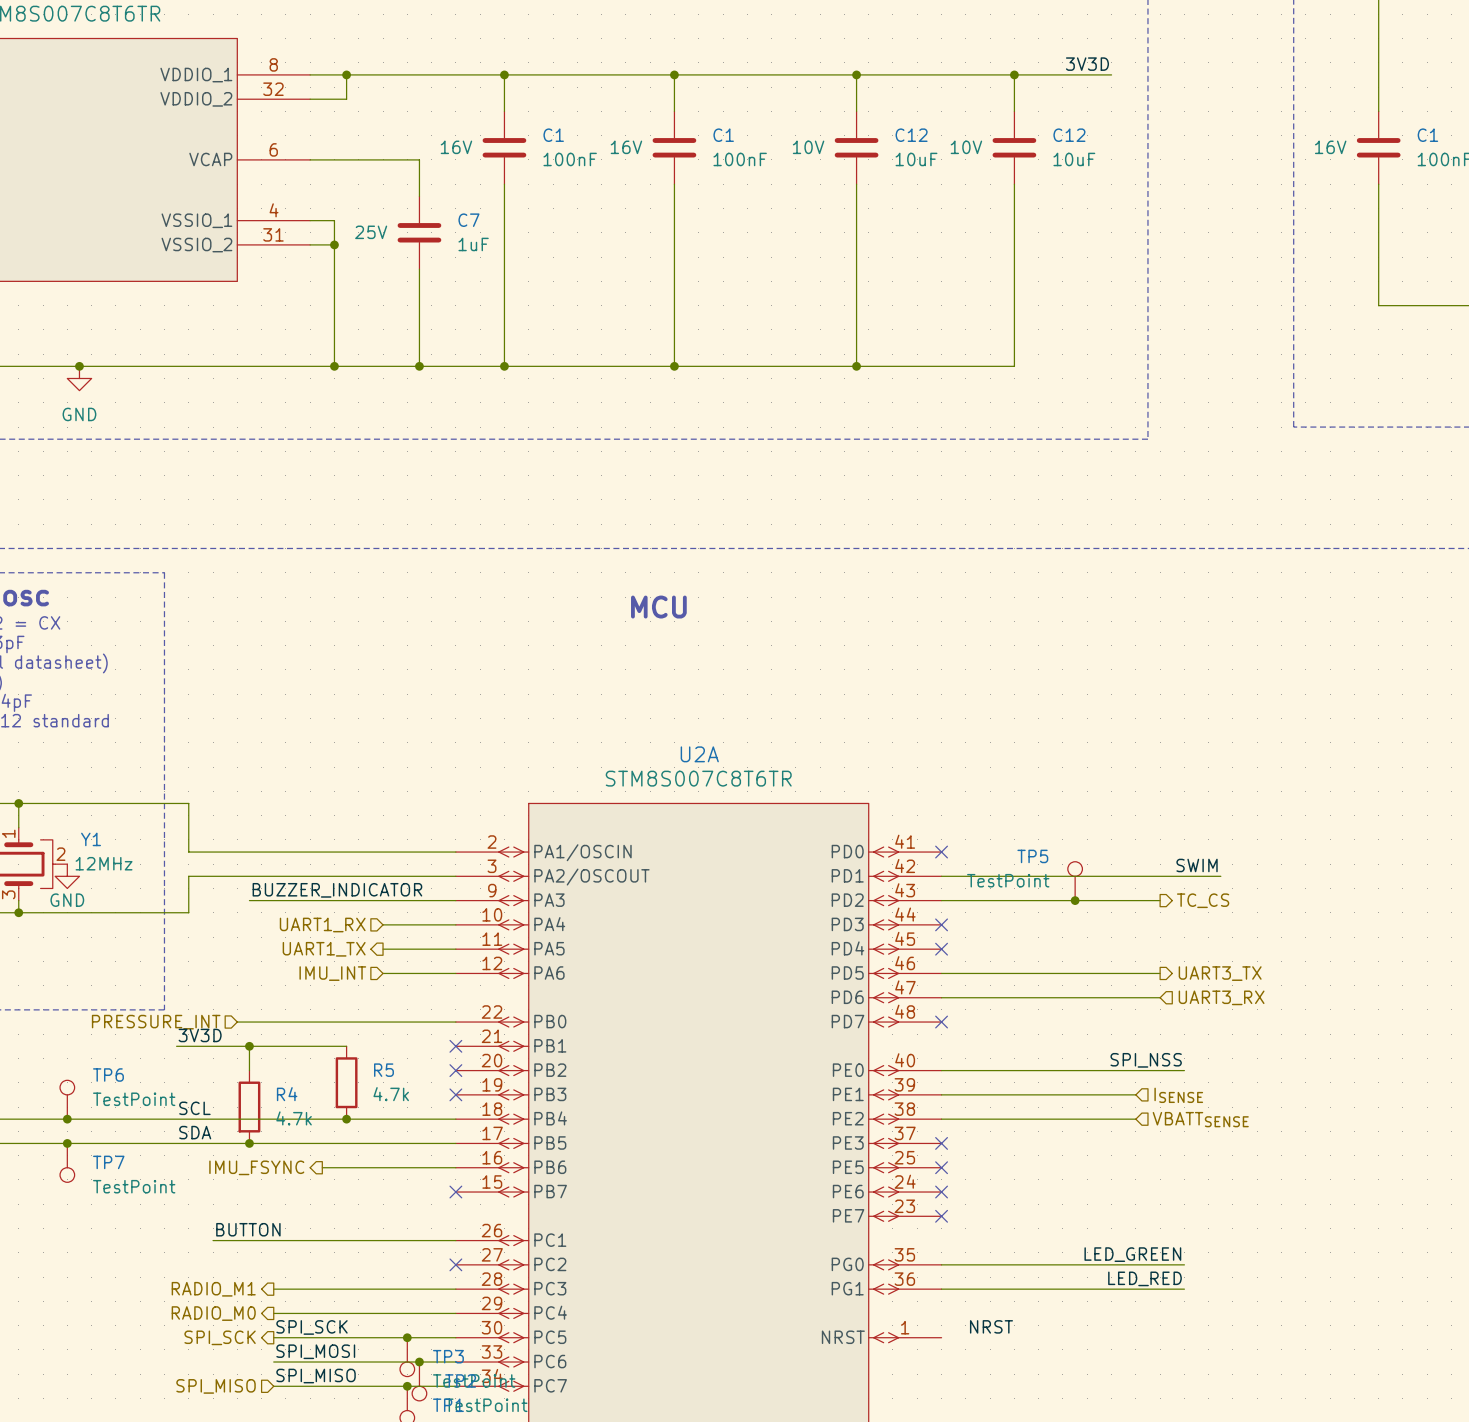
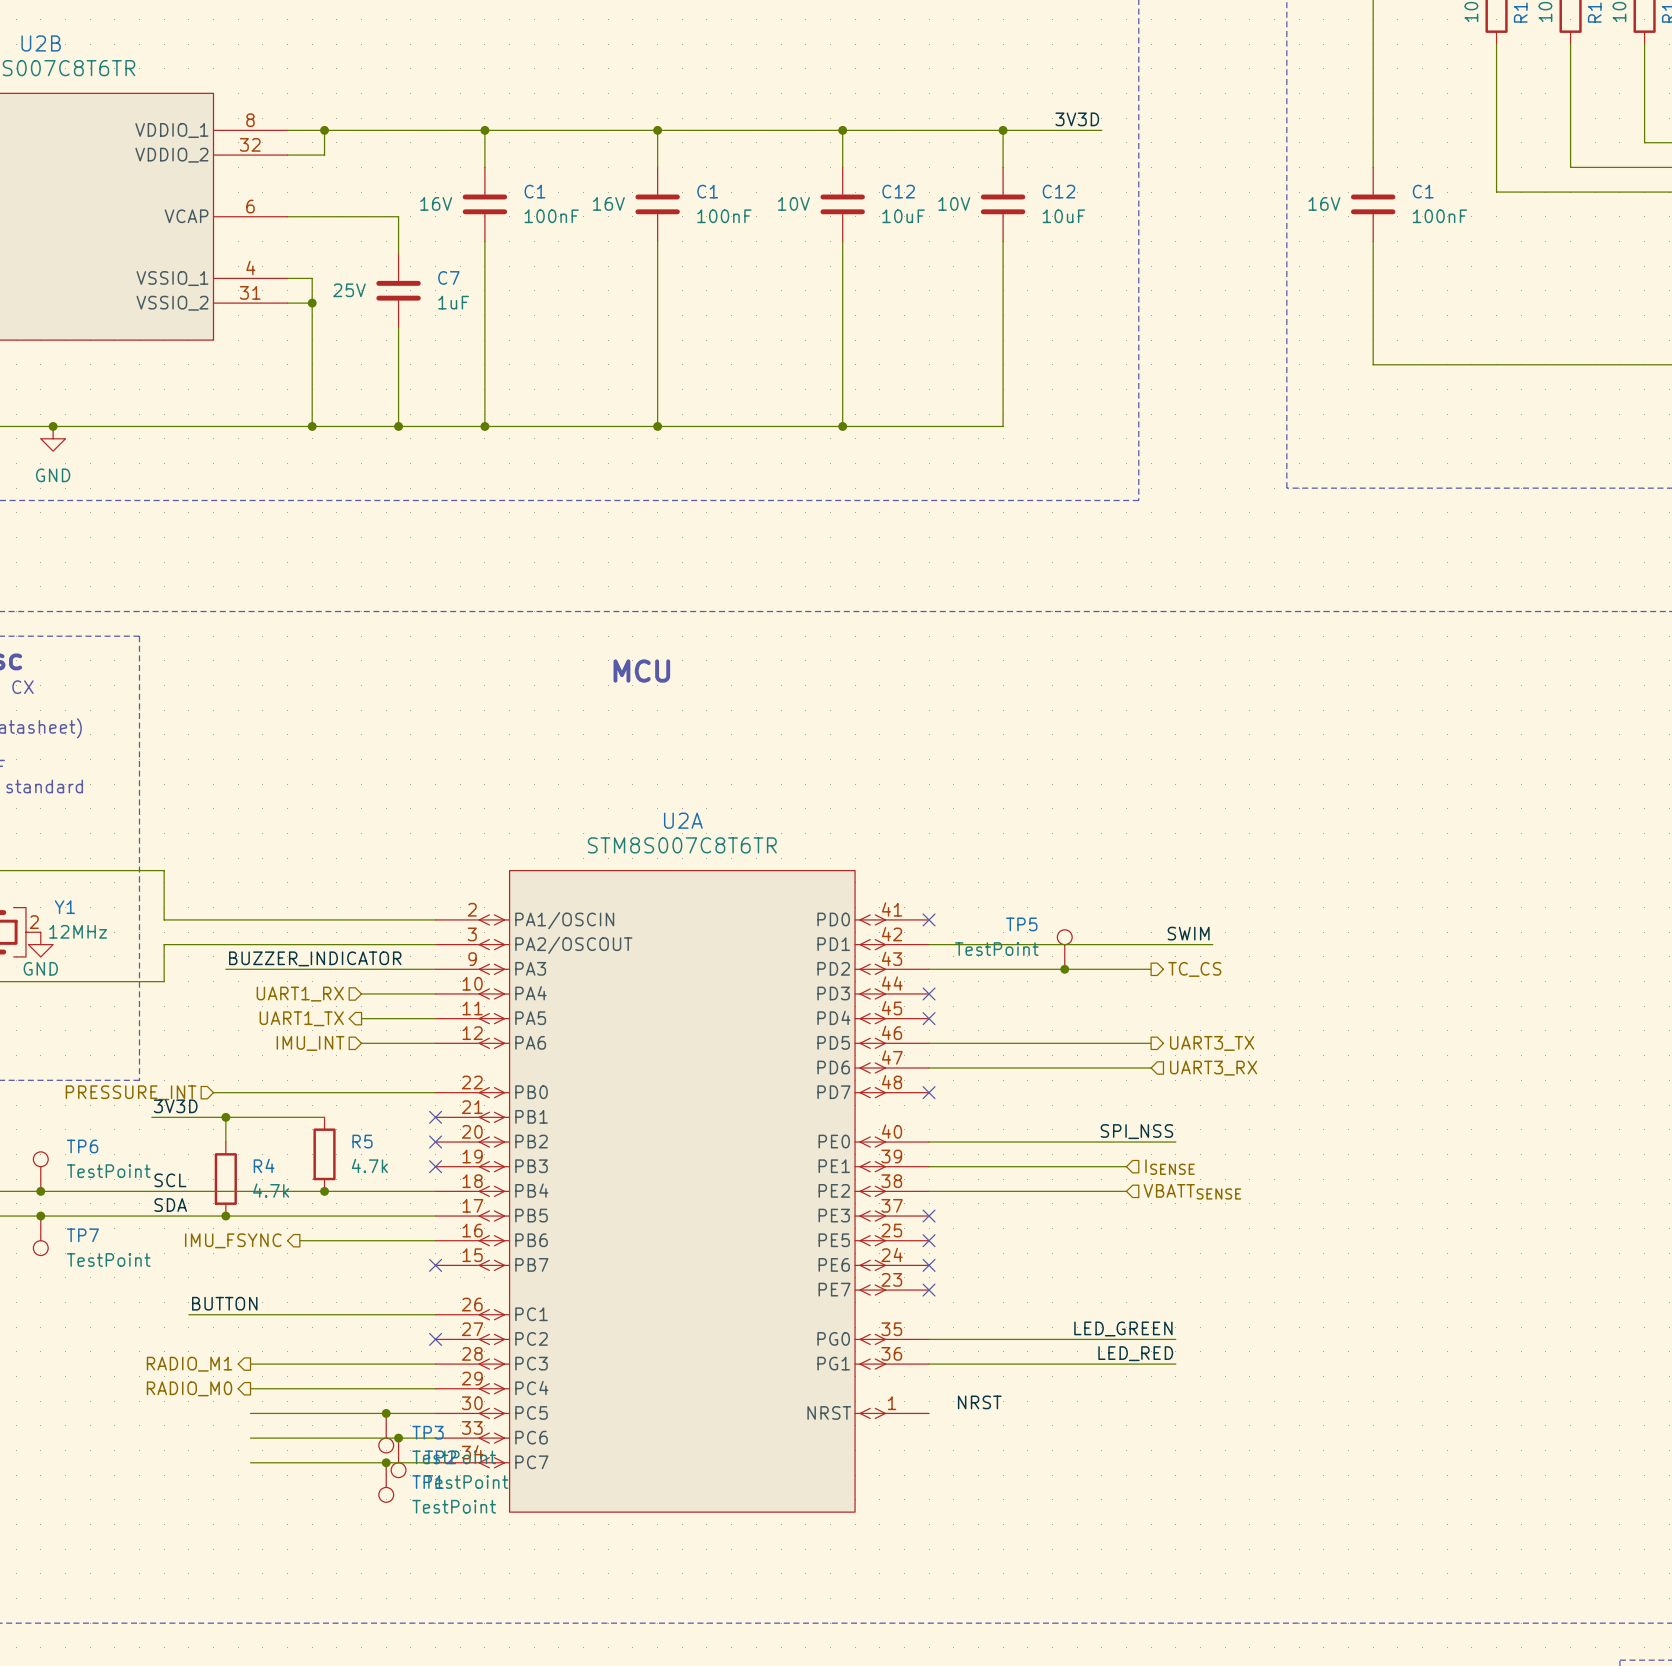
label: SPI_SCK (311, 1327) -> none
hierarchical label: SPI_SCK (220, 1337) -> none
label: SPI_MOSI (315, 1351) -> none
label: SPI_MISO (316, 1376) -> none
hierarchical label: SPI_MISO (216, 1386) -> none

